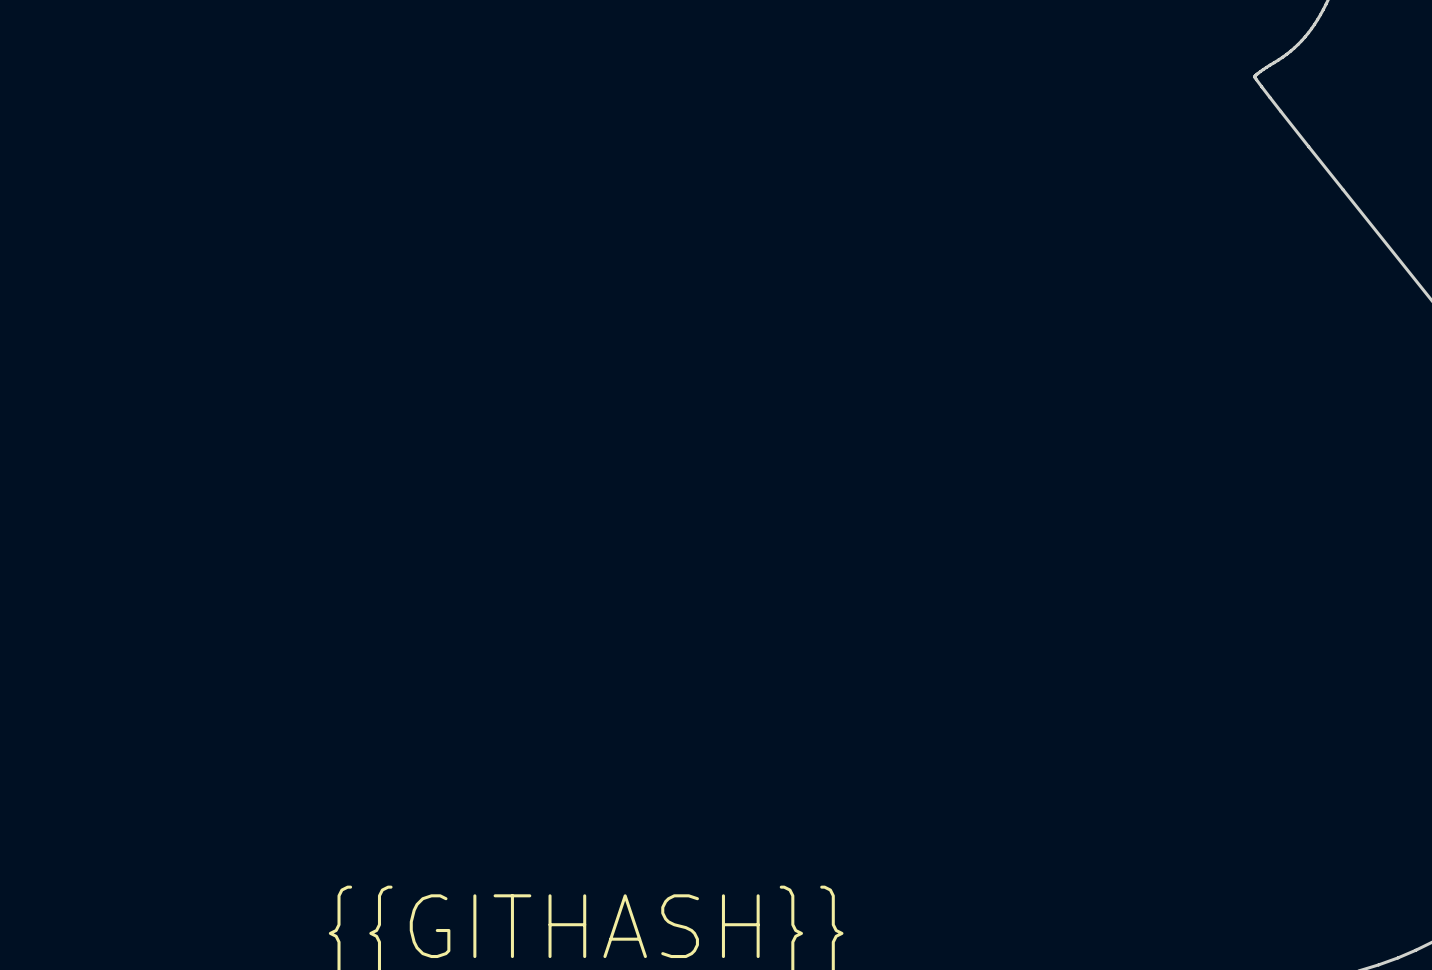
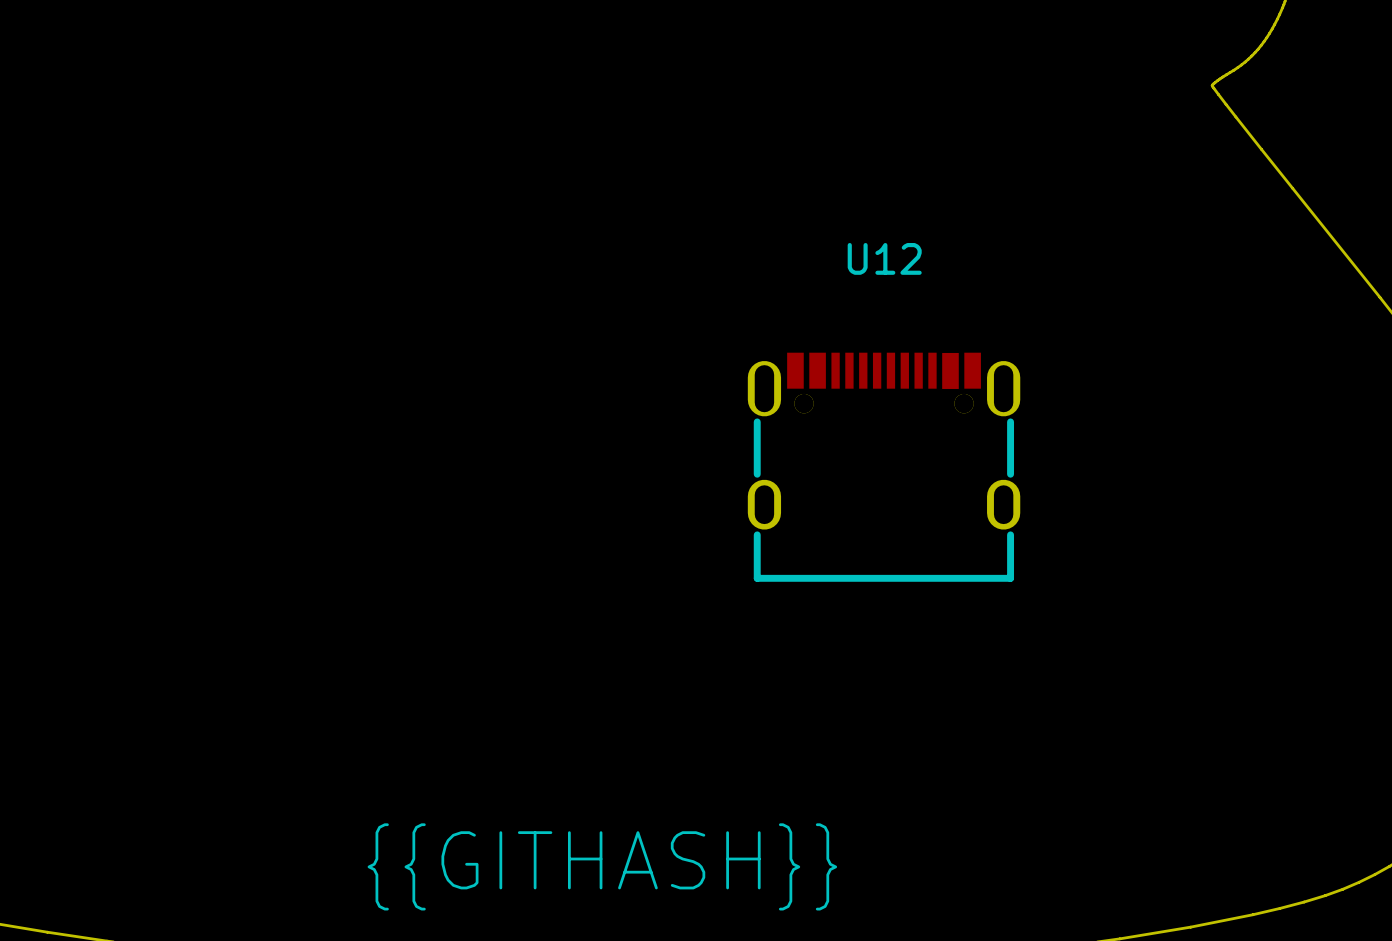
U12: none -> (884, 467)

